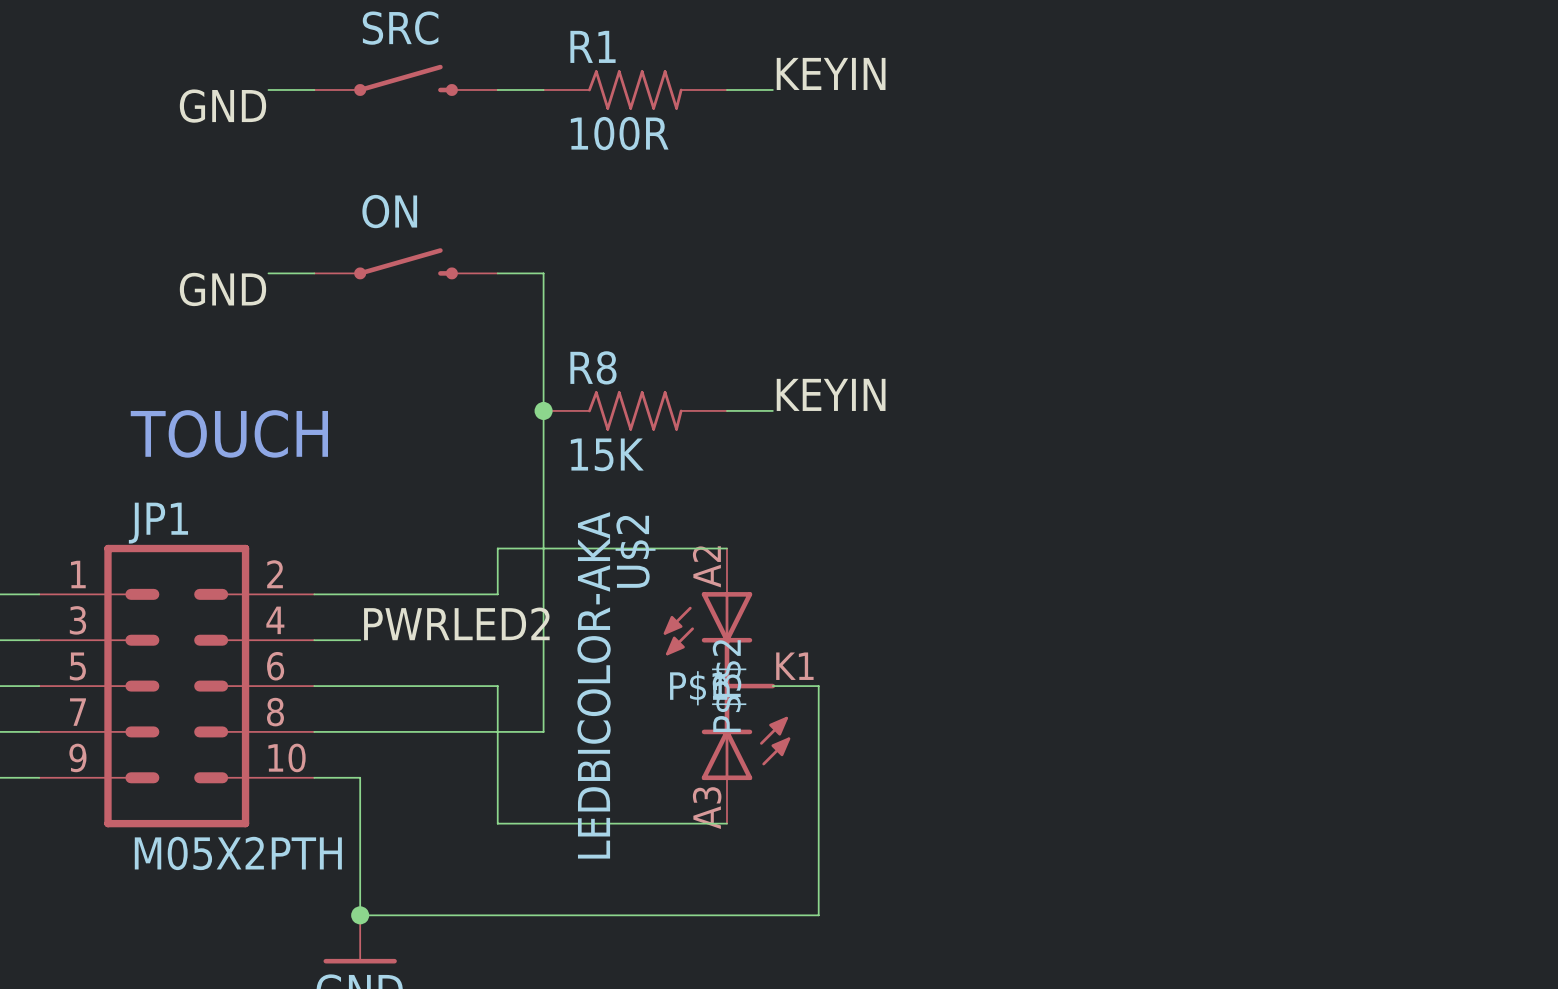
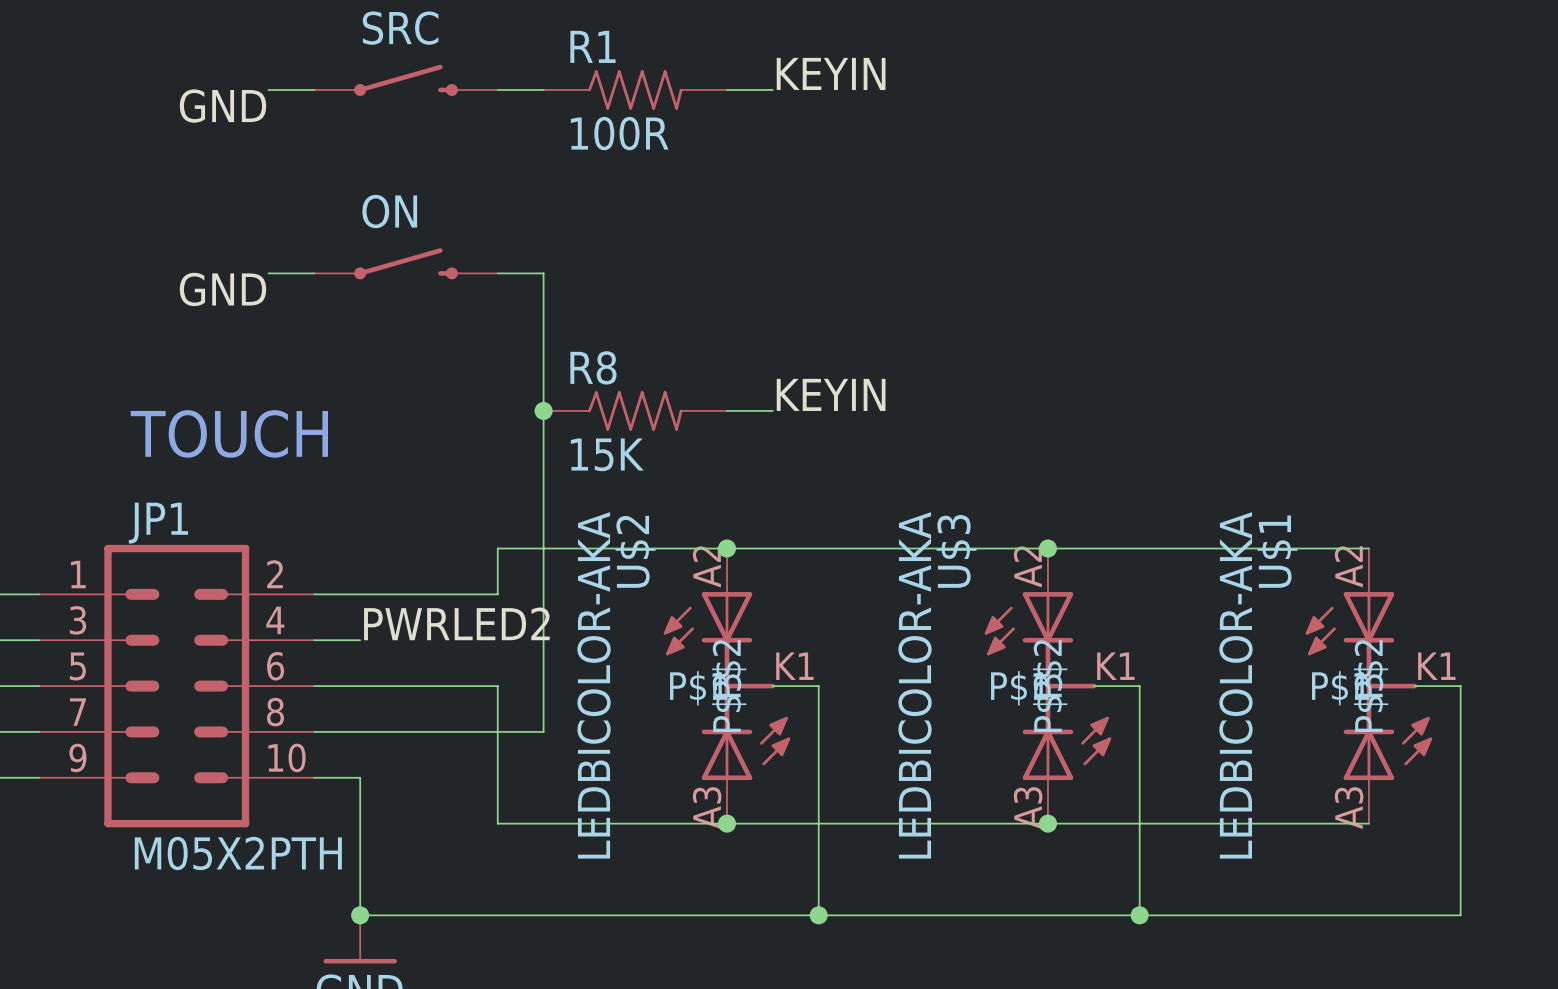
wire: none -> (726, 548) (1368, 548)
junction: none -> (726, 548)
junction: none -> (1047, 548)
U$3: none -> LEDBICOLOR-AKA (1047, 686)
wire: none -> (1093, 686) (1139, 686) (1139, 915)
U$1: none -> LEDBICOLOR-AKA (1368, 686)
wire: none -> (1414, 686) (1460, 686) (1460, 915) (818, 915)
wire: none -> (726, 823) (1368, 823)
junction: none -> (726, 823)
junction: none -> (1047, 823)
junction: none -> (818, 915)
junction: none -> (1139, 915)

